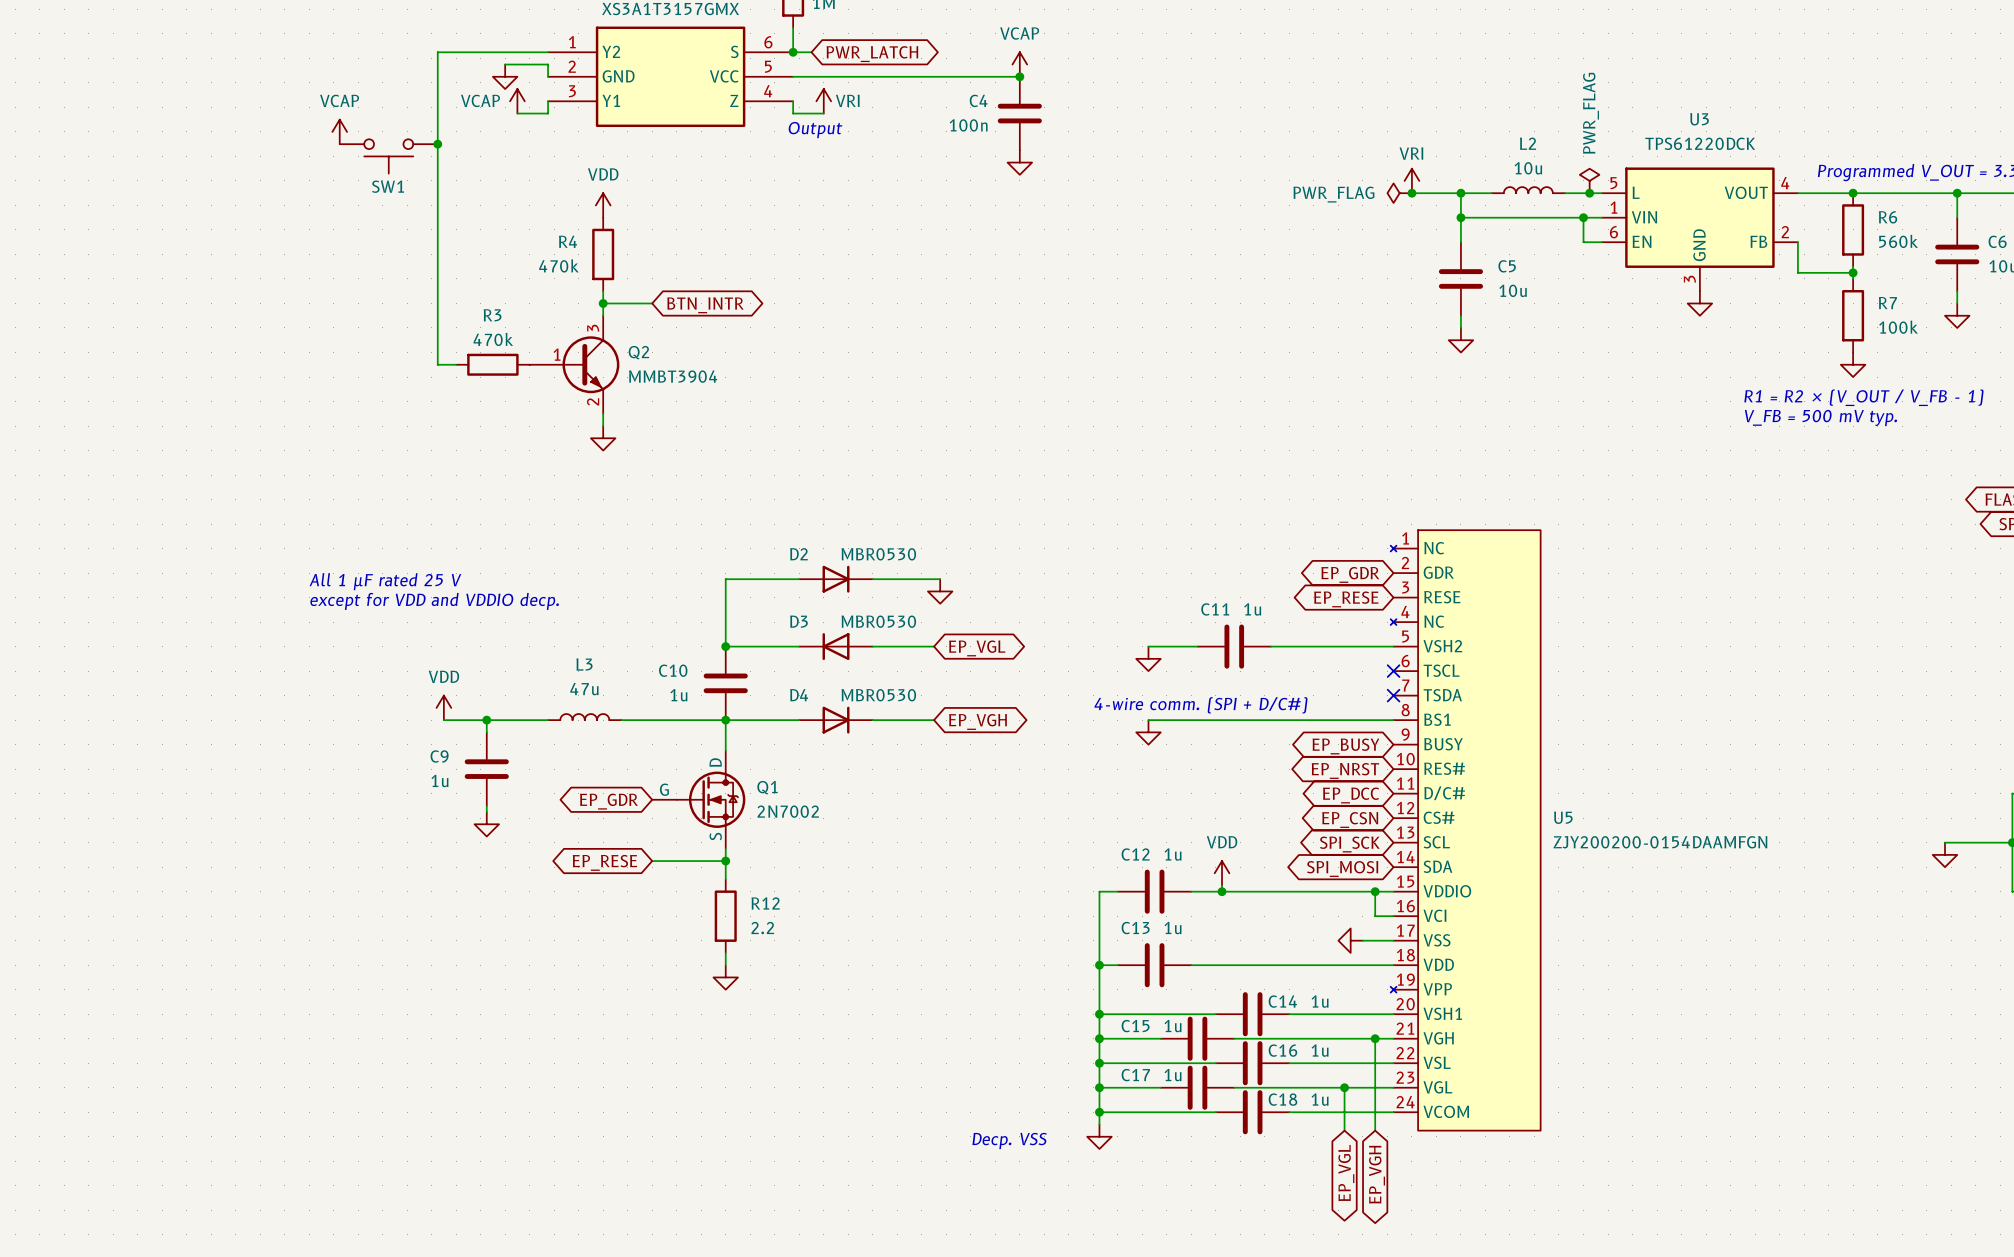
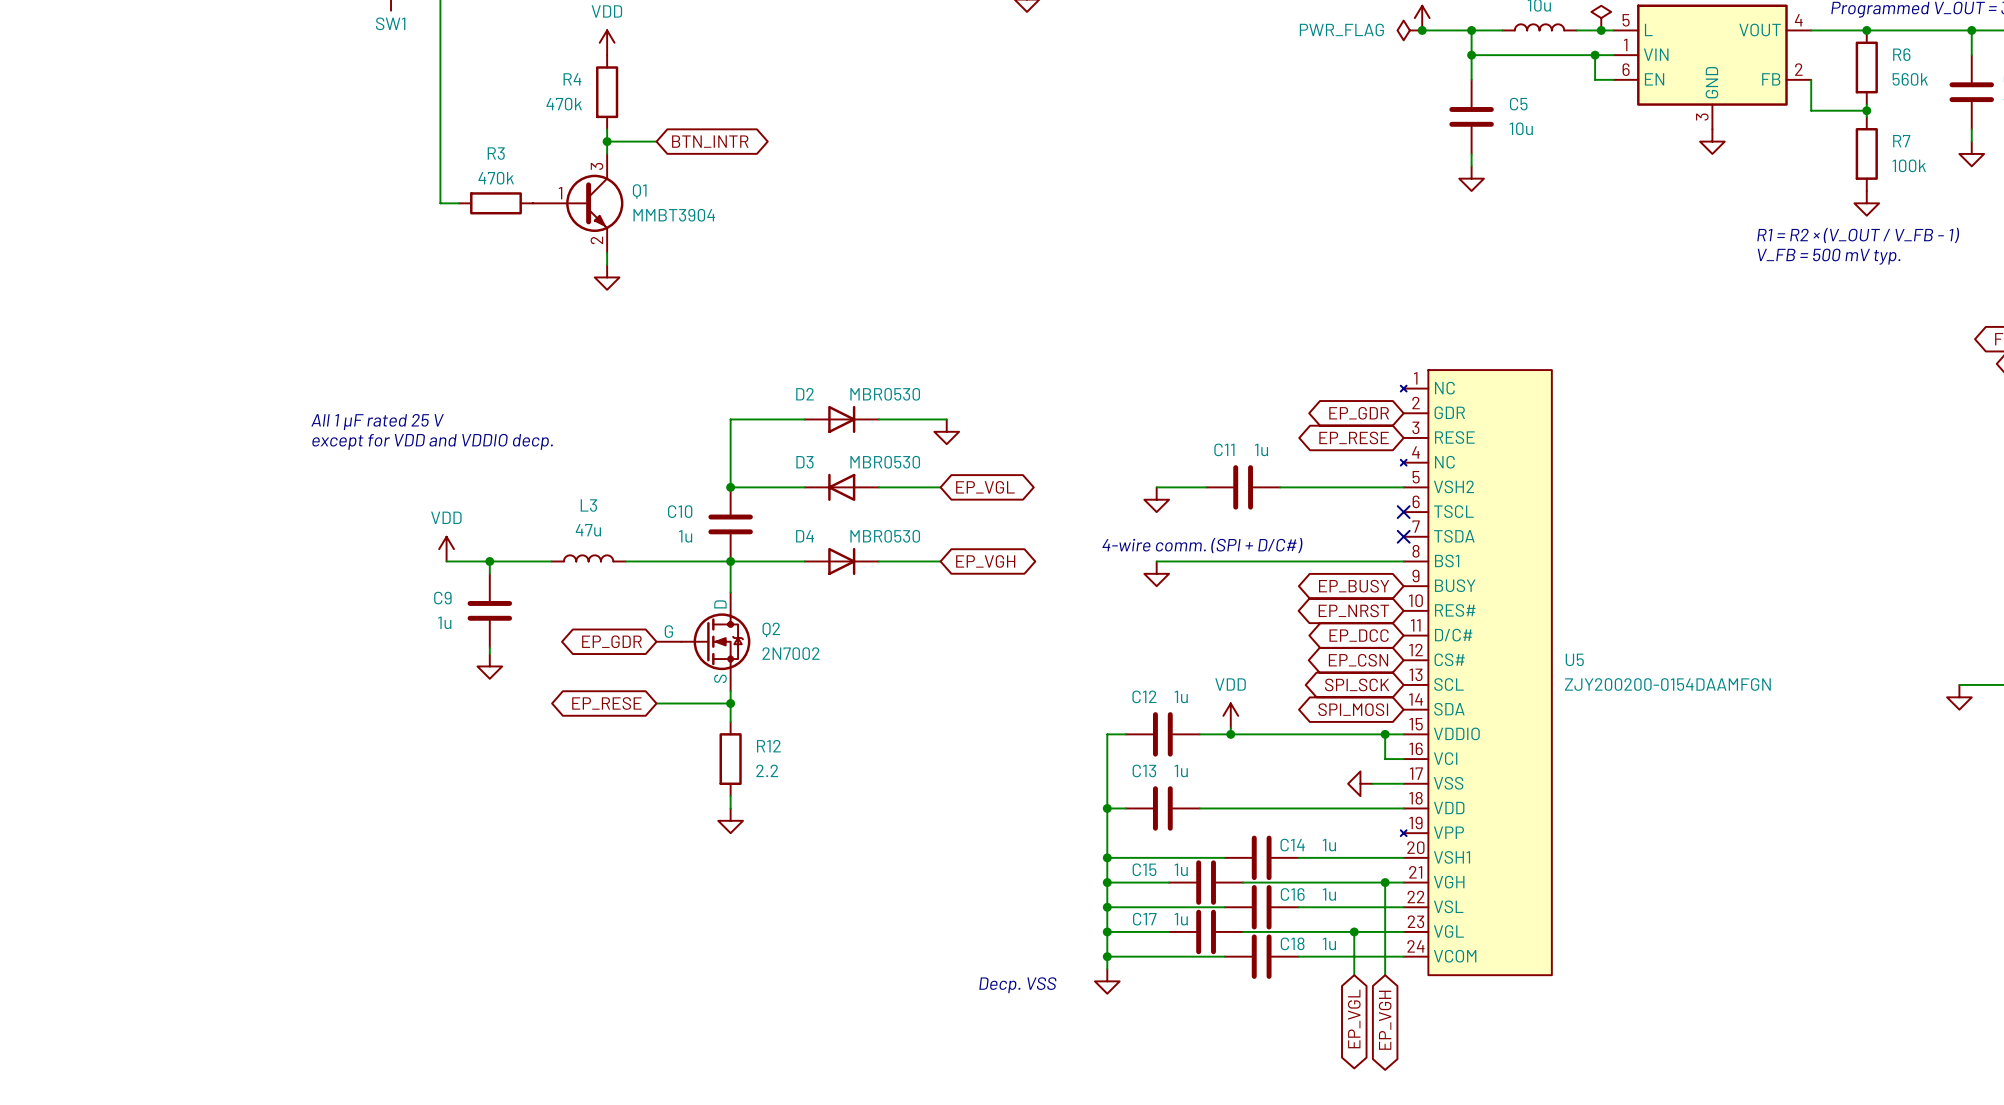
Q2 name: Q2 (638, 352) -> Q1 (639, 191)
Q1 name: Q1 (767, 787) -> Q2 (771, 629)

